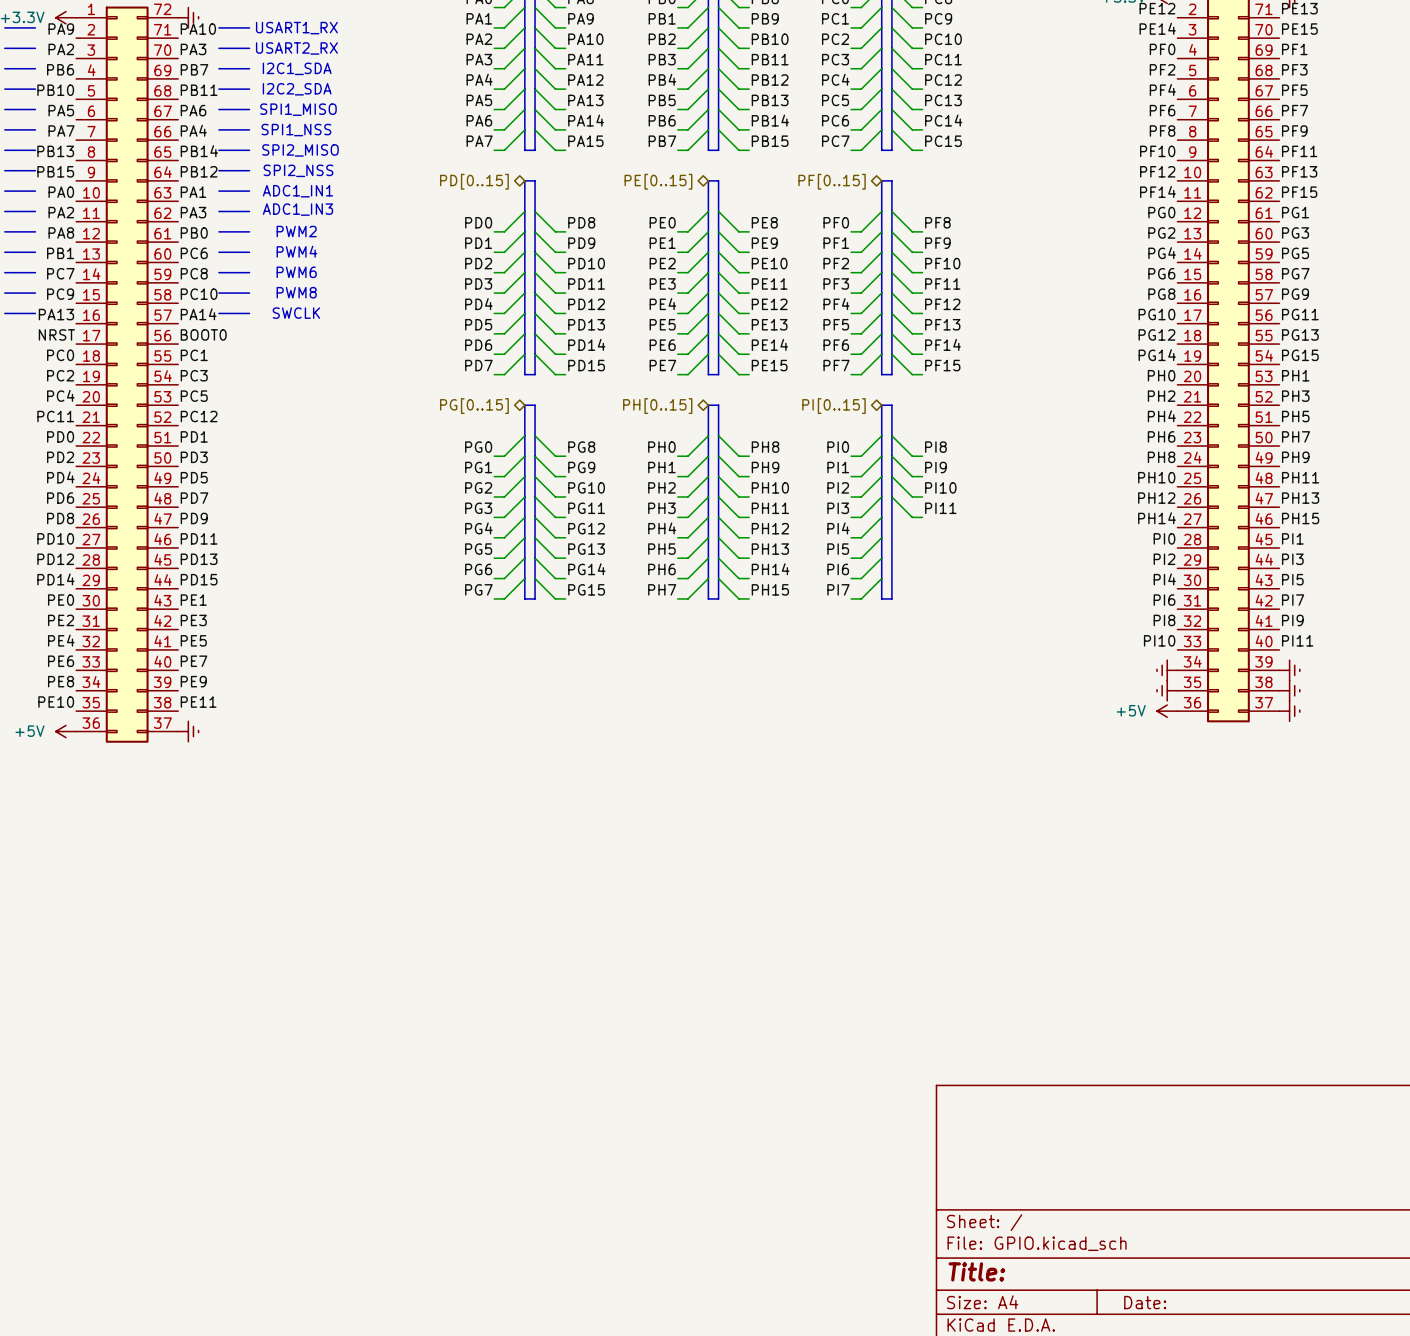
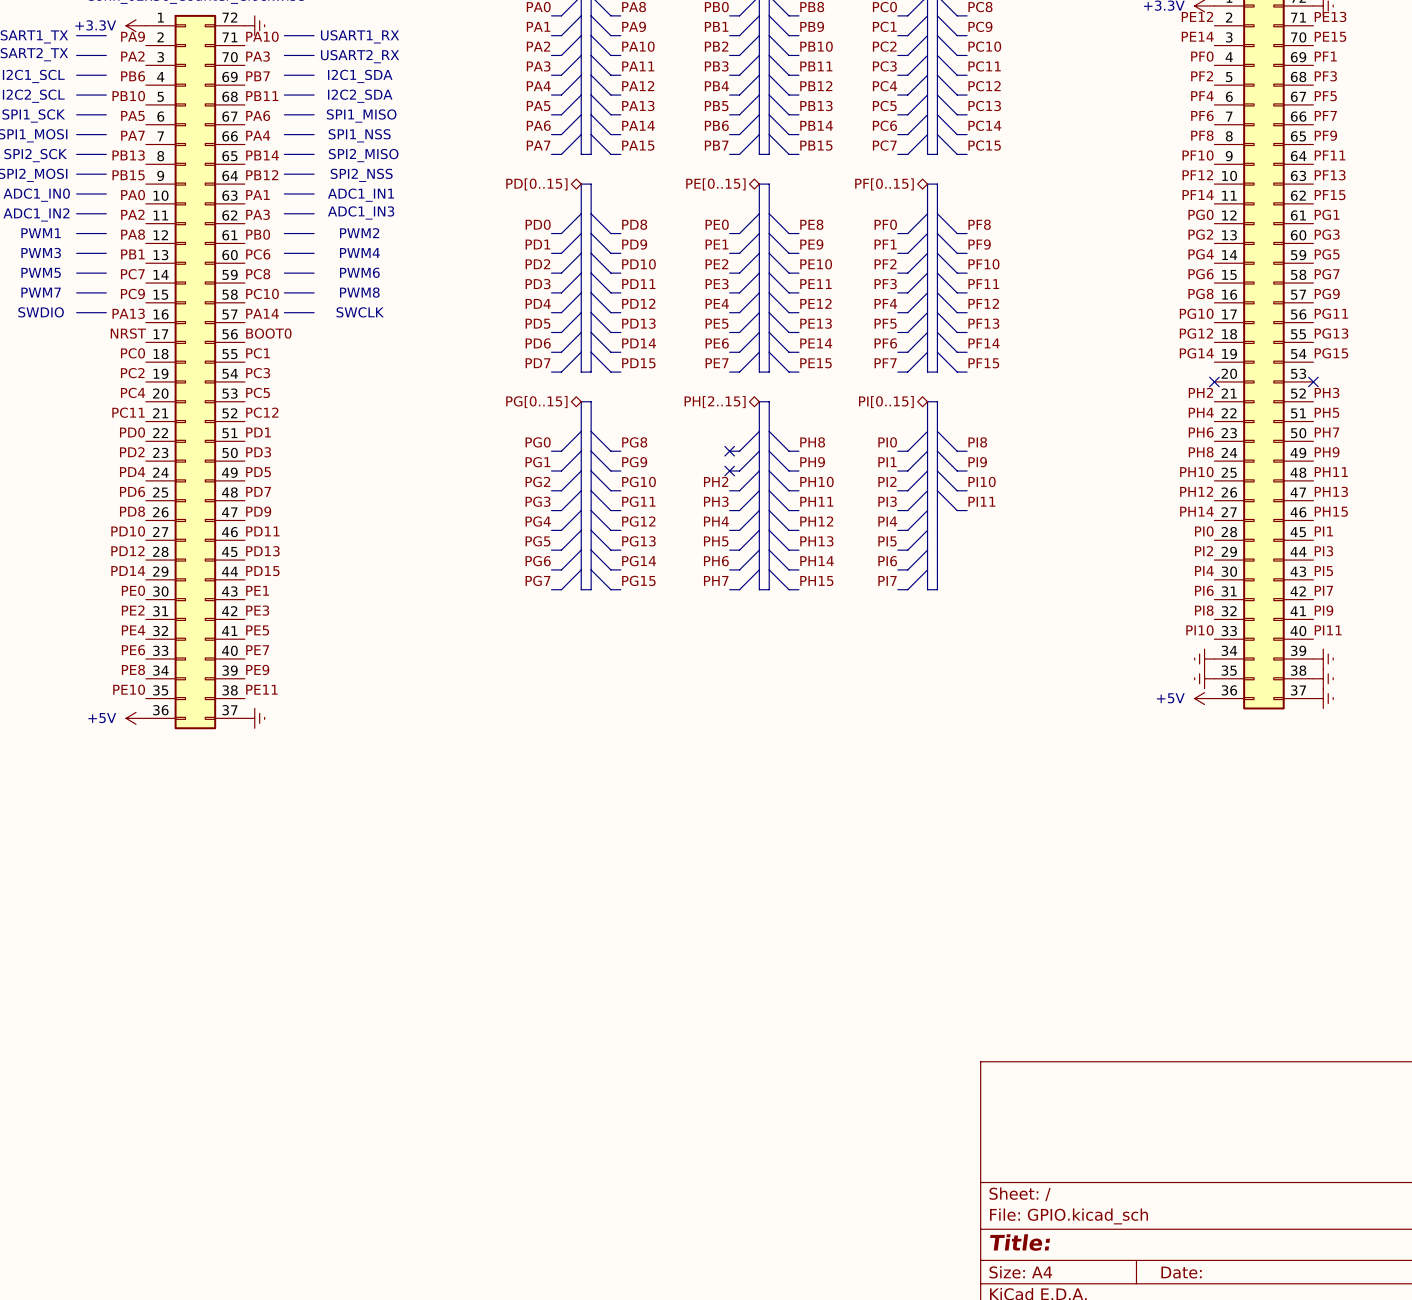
label: PH0 (1161, 375) -> none
label: PH1 (1295, 375) -> none
no-connect mark: none -> (1214, 381)
no-connect mark: none -> (1313, 381)
hierarchical label: PH[0..15] (657, 406) -> PH[2..15] (715, 402)
label: PH0 (661, 447) -> none
no-connect mark: none -> (729, 451)
label: PH1 (661, 467) -> none
no-connect mark: none -> (729, 471)

